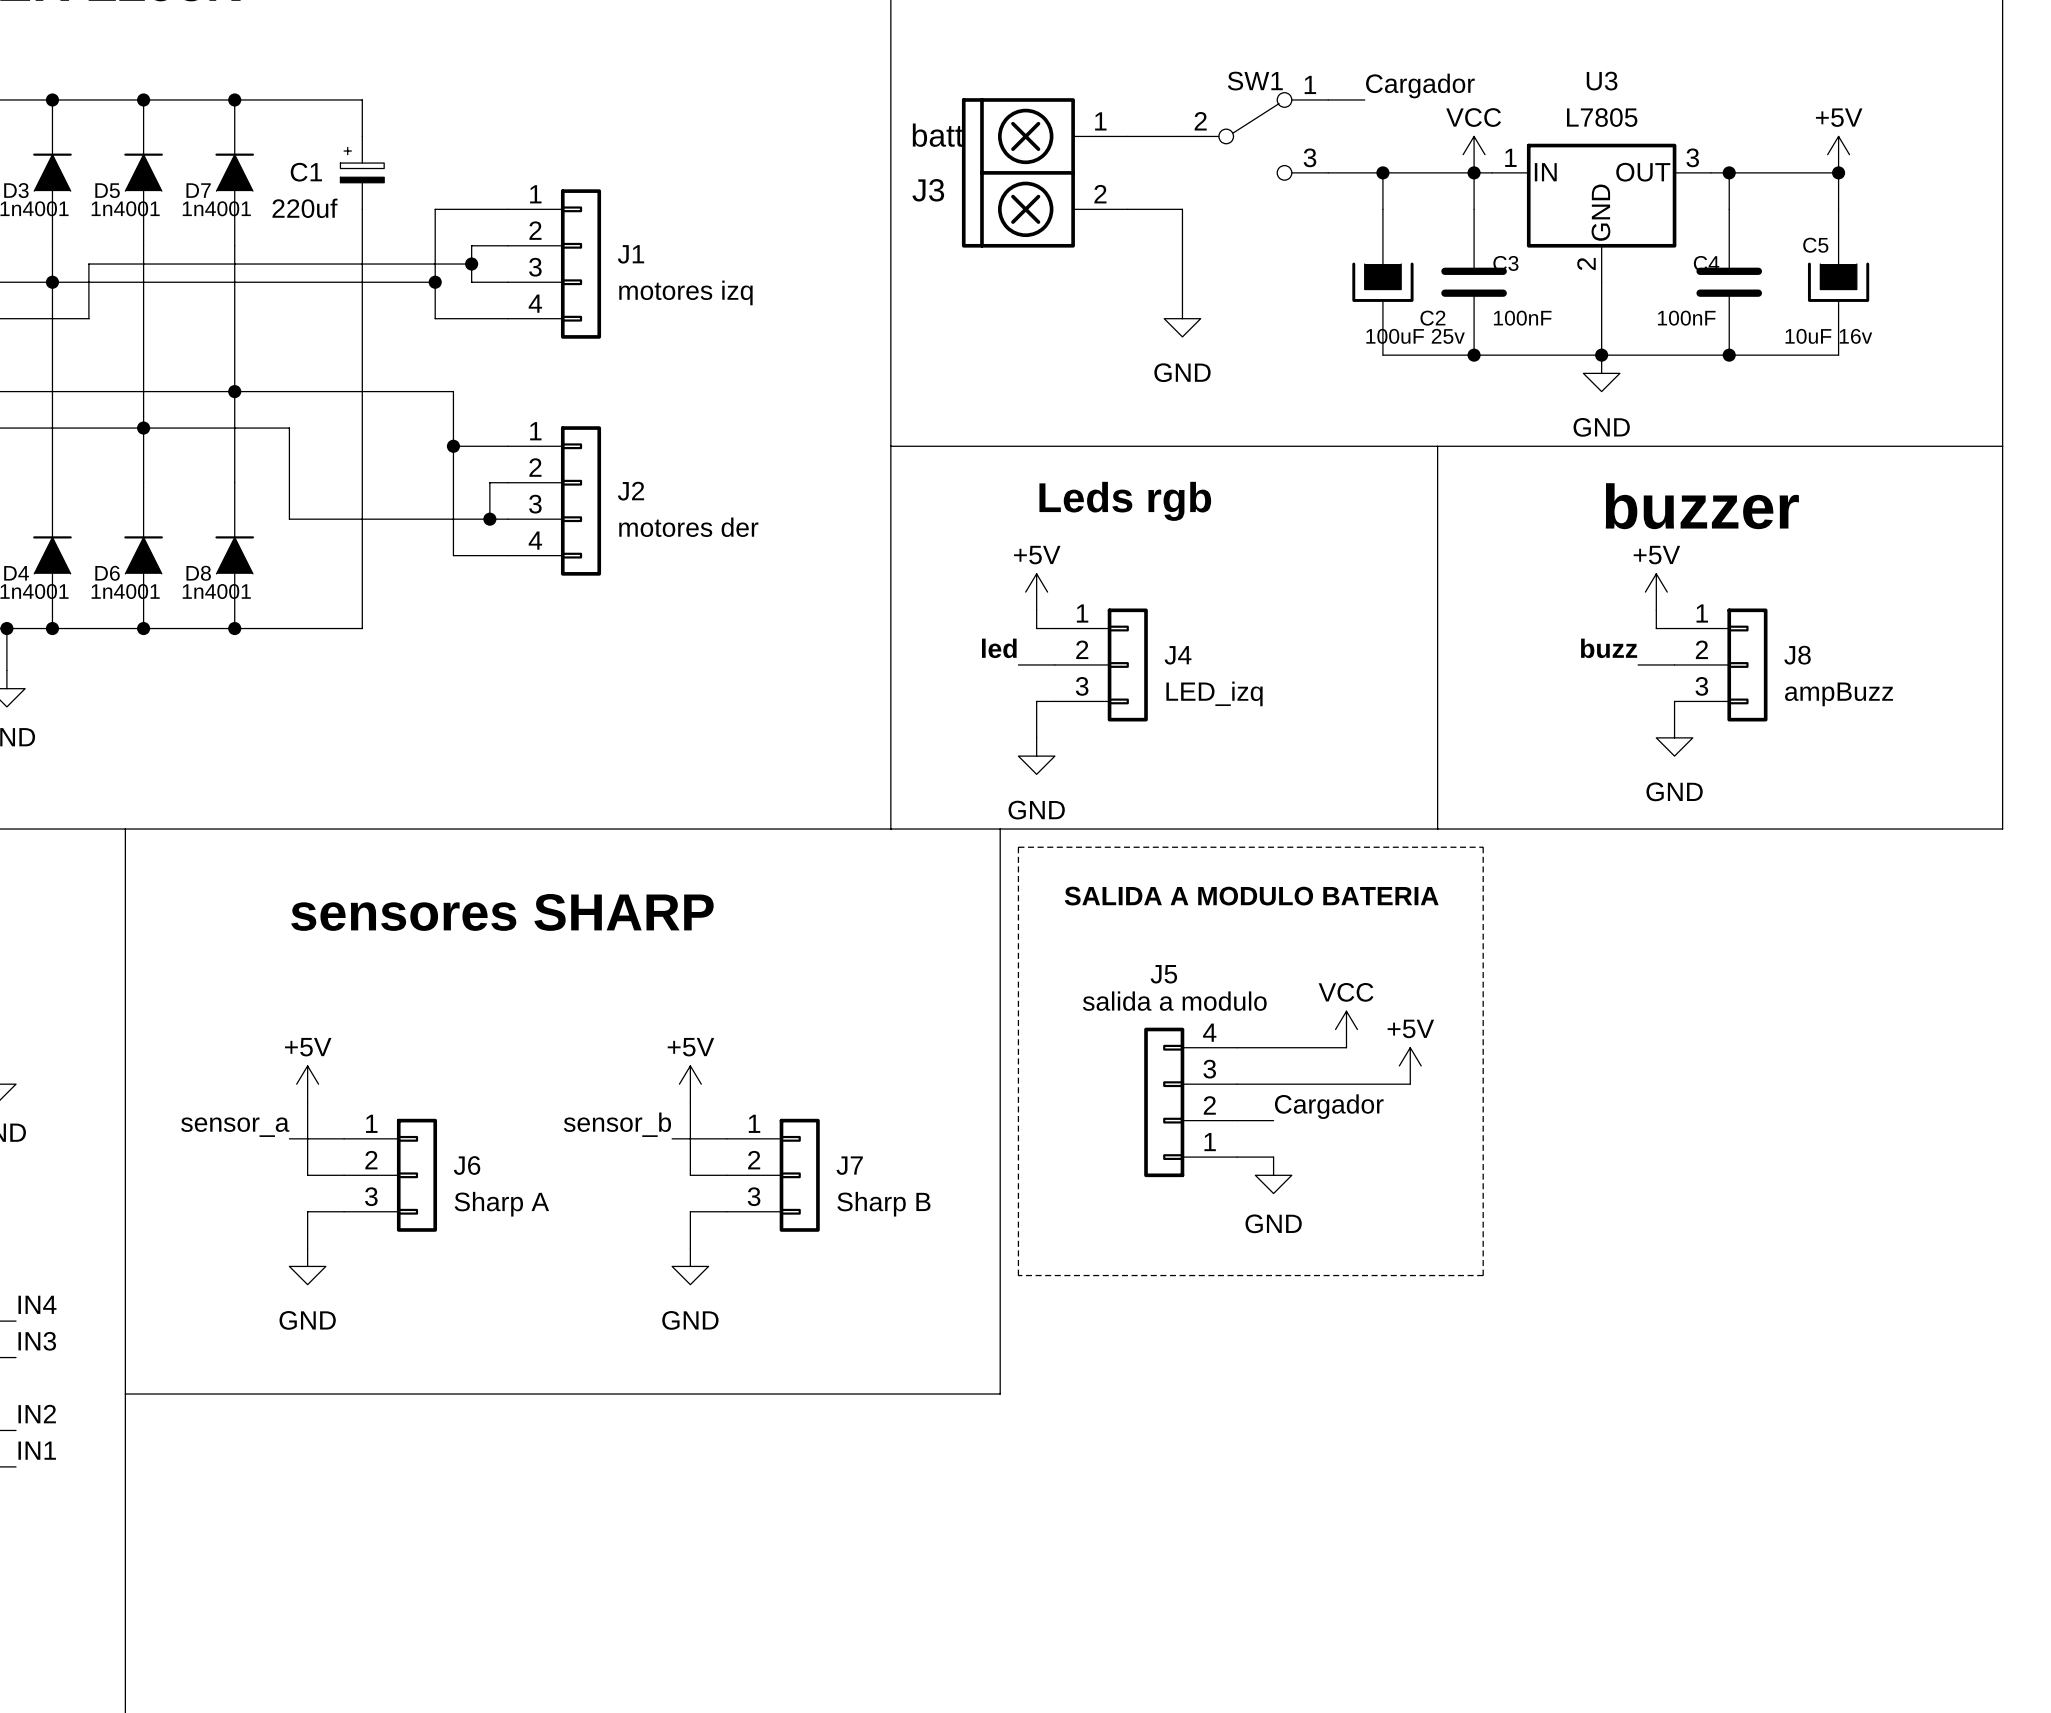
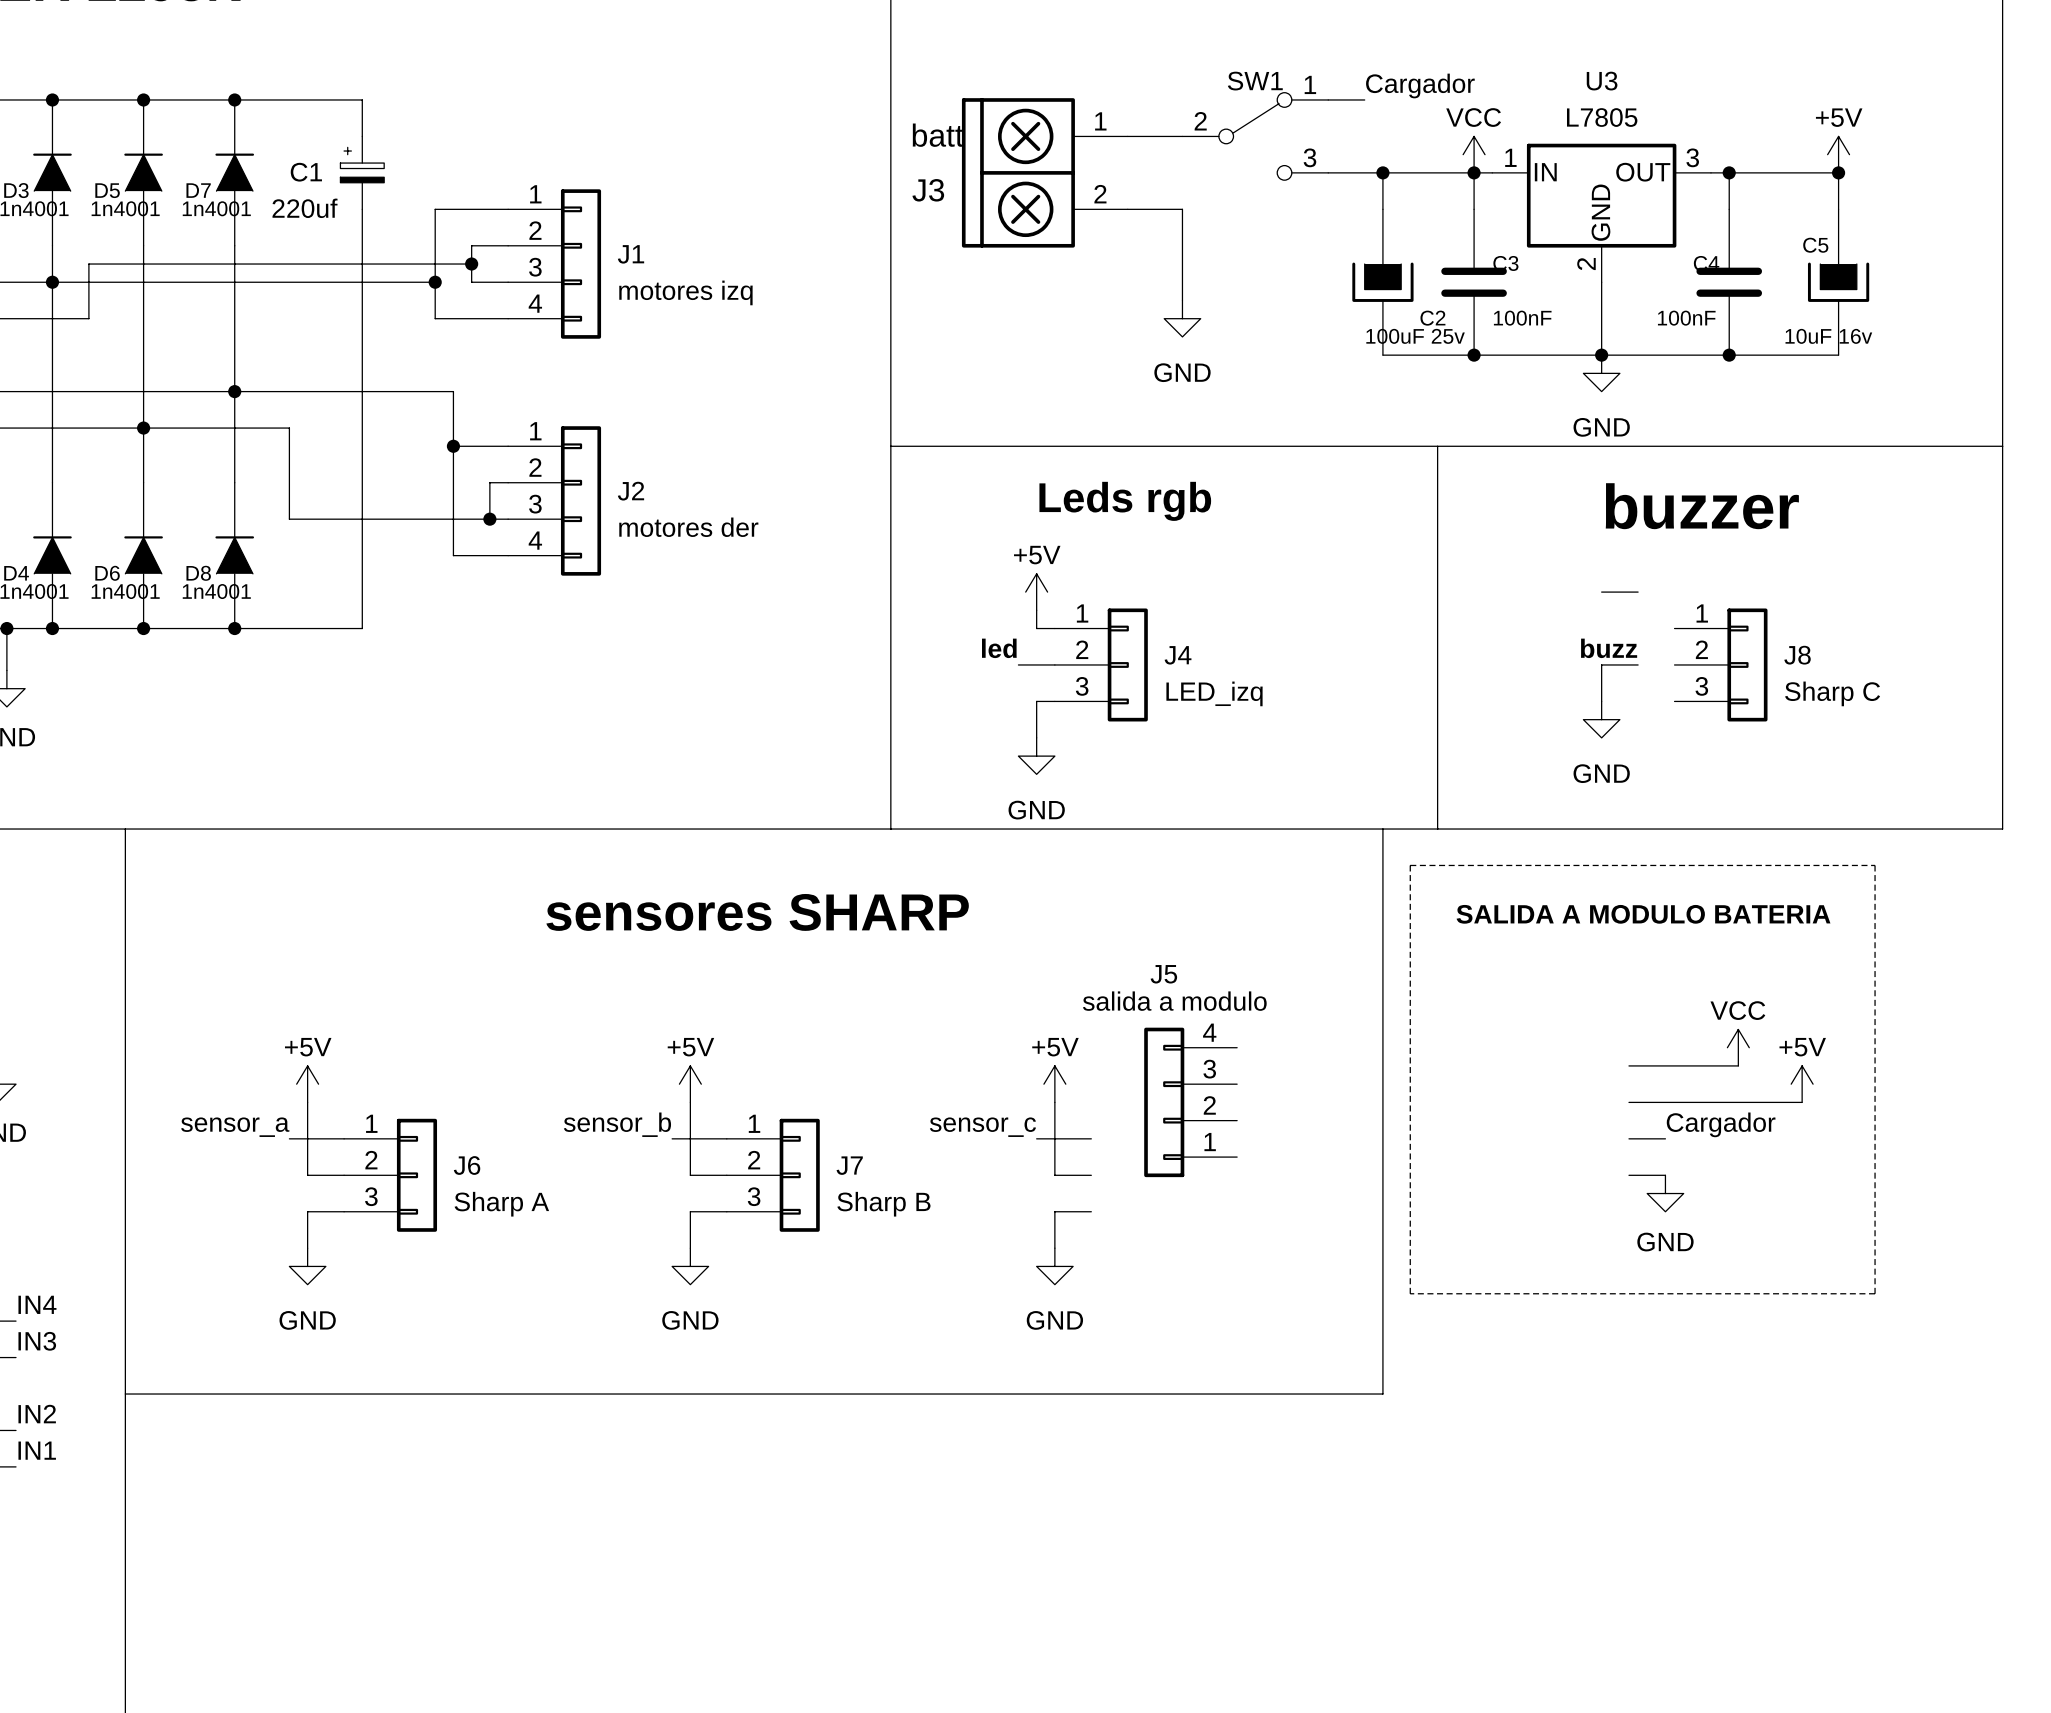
wire: none -> (1601, 592) (1638, 592)
power symbol: +5V (1656, 592) -> none
wire: (1656, 610) (1656, 628) (1674, 628) -> none
wire: (1638, 664) (1674, 664) -> (1638, 664) (1601, 664) (1601, 701)
J8 value: ampBuzz (1839, 694) -> Sharp C (1832, 693)
wire: (1674, 701) (1674, 719) -> none
power symbol position: GND (1674, 737) -> GND (1601, 719)
line: (1000, 829) (1000, 1394) -> (1382, 829) (1382, 1394) (1000, 1394)
line: (1018, 847) (1018, 1275) (1483, 1275) (1483, 847) (1018, 847) -> none
line: none -> (1410, 865) (1410, 1293) (1875, 1293) (1875, 865) (1410, 865)
text: SALIDA A MODULO BATERIA (1251, 896) -> none
text position: sensores SHARP (502, 912) -> sensores SHARP (757, 912)
text: none -> SALIDA A MODULO BATERIA (1643, 914)
power symbol: VCC (1346, 1029) -> none
wire: (1237, 1047) (1346, 1047) -> none
power symbol: none -> VCC (1738, 1047)
power symbol: +5V (1410, 1065) -> none
wire: none -> (1628, 1065) (1738, 1065)
power symbol: none -> +5V (1054, 1084)
wire: (1237, 1084) (1410, 1084) -> none
power symbol: none -> +5V (1802, 1084)
wire: none -> (1054, 1102) (1054, 1175) (1091, 1175)
wire: none -> (1628, 1102) (1802, 1102)
label: Cargador (1329, 1106) -> none
wire: (1237, 1120) (1273, 1120) -> none
label: none -> Cargador (1721, 1124)
label: none -> sensor_c (982, 1127)
wire: none -> (1036, 1138) (1091, 1138)
wire: none -> (1628, 1138) (1665, 1138)
wire: (1237, 1157) (1273, 1157) -> none
power symbol: GND (1273, 1175) -> none
wire: none -> (1628, 1175) (1665, 1175)
power symbol: none -> GND (1665, 1193)
wire: none -> (1091, 1211) (1054, 1211) (1054, 1248)
power symbol: none -> GND (1054, 1266)

